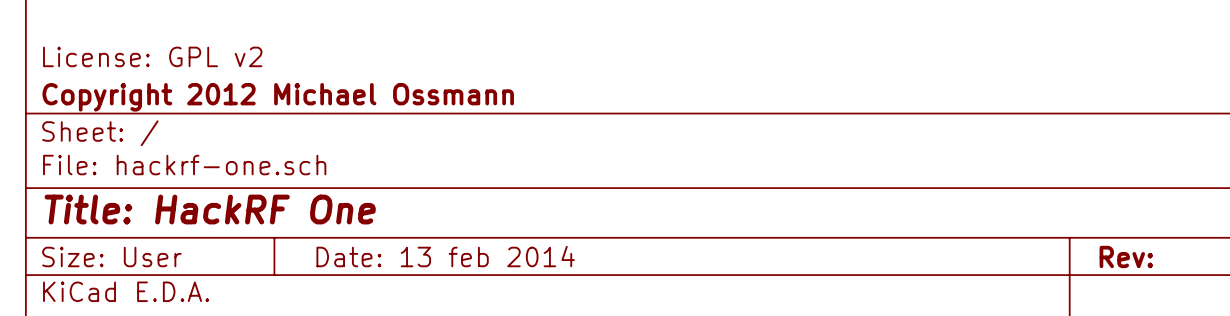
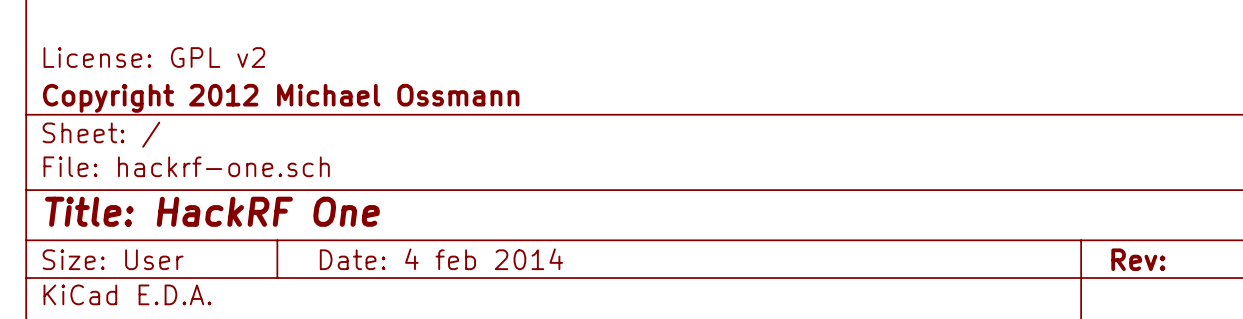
title block: Date: 13 feb 2014 (445, 256) -> Date: 4 feb 2014 (441, 259)

